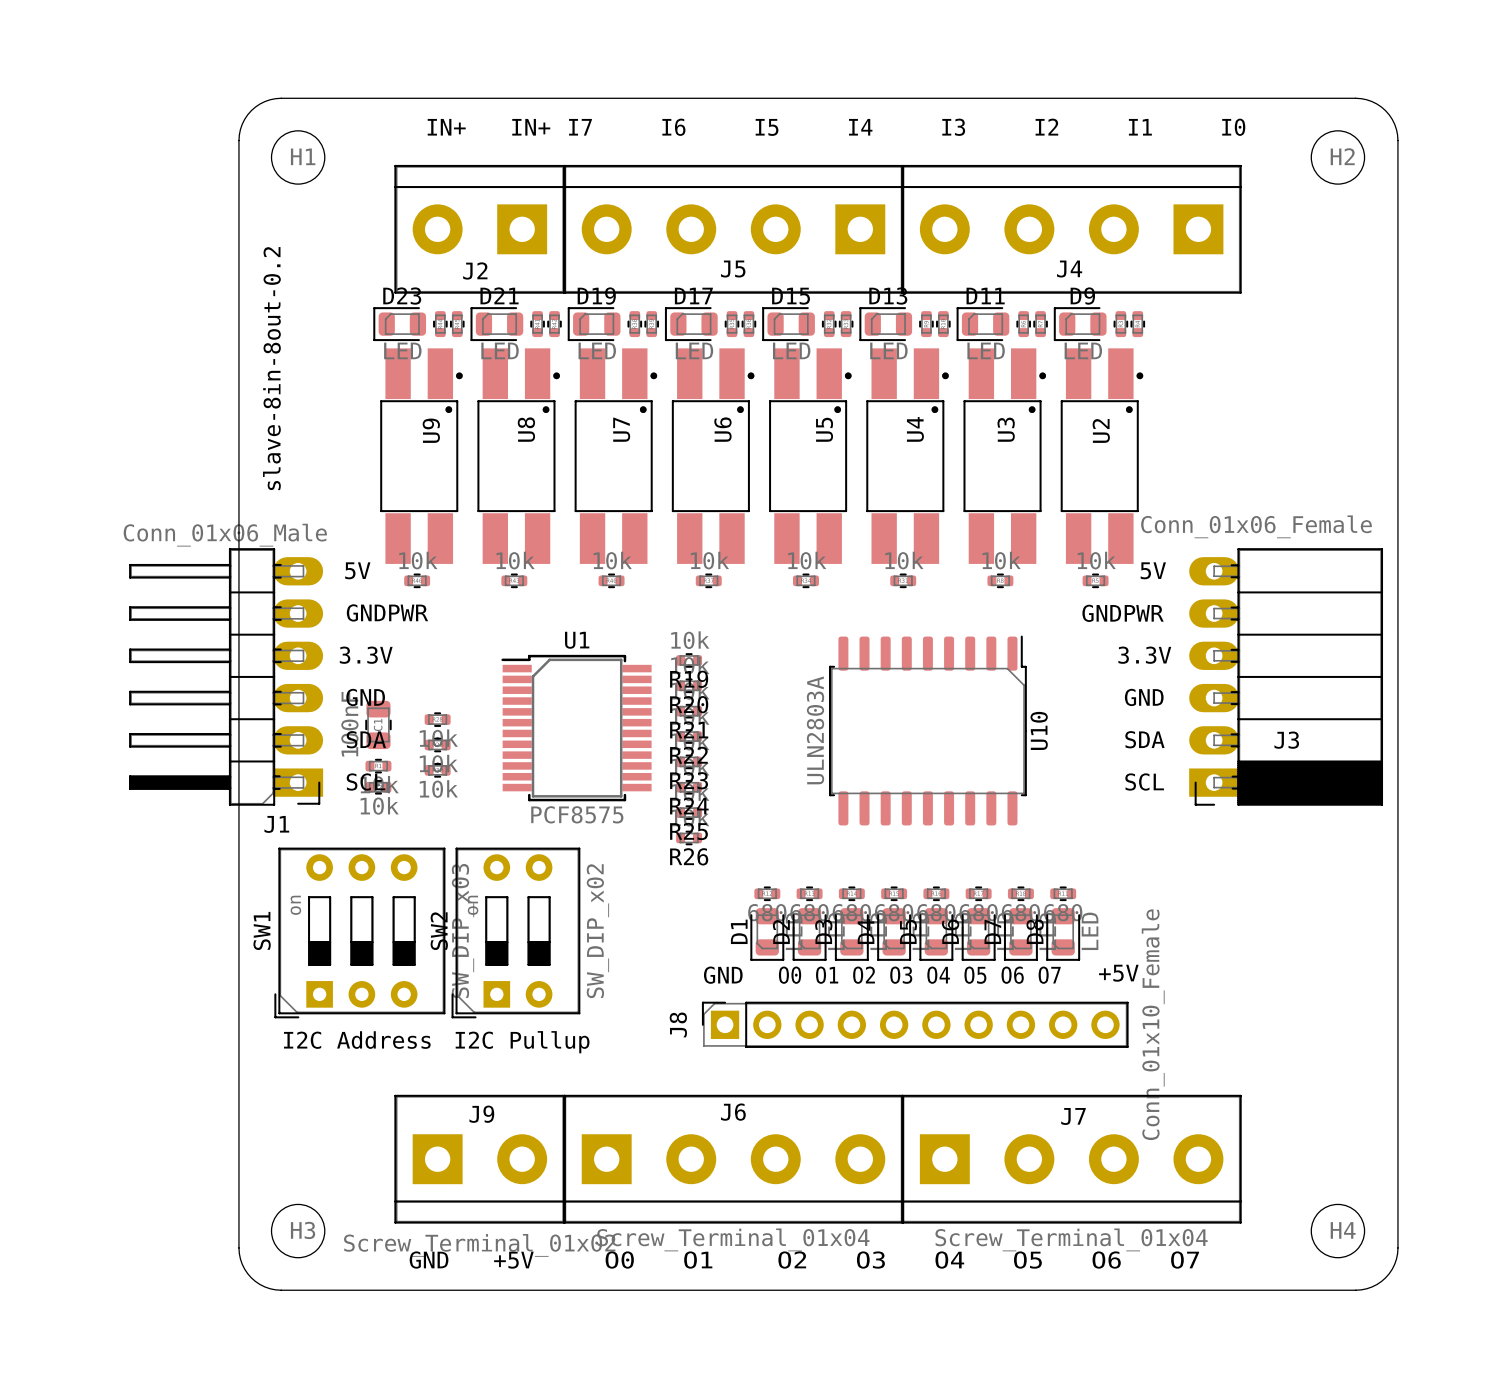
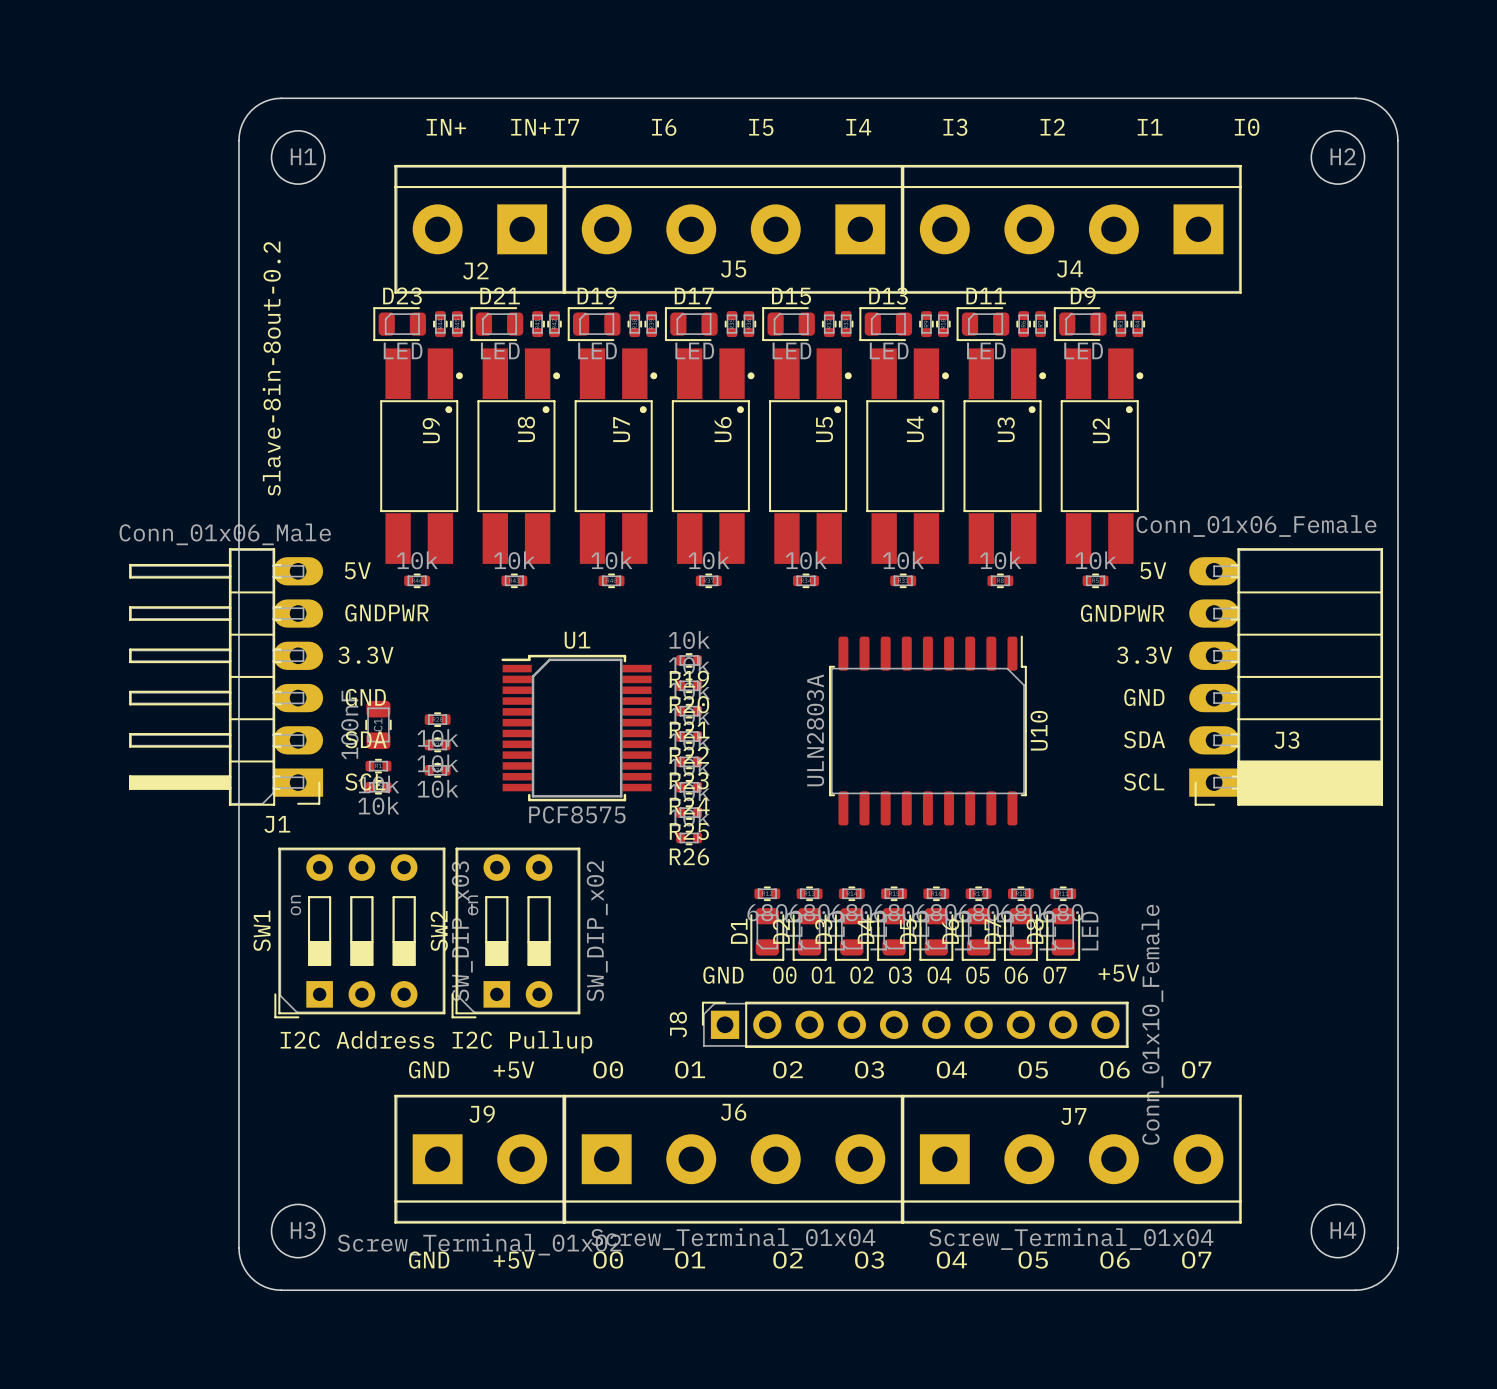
text: none -> GND (429, 1069)
text: none -> +5V (514, 1069)
text: none -> O0 O1 O2 O3 O4 O5 O6 O7 (902, 1069)

